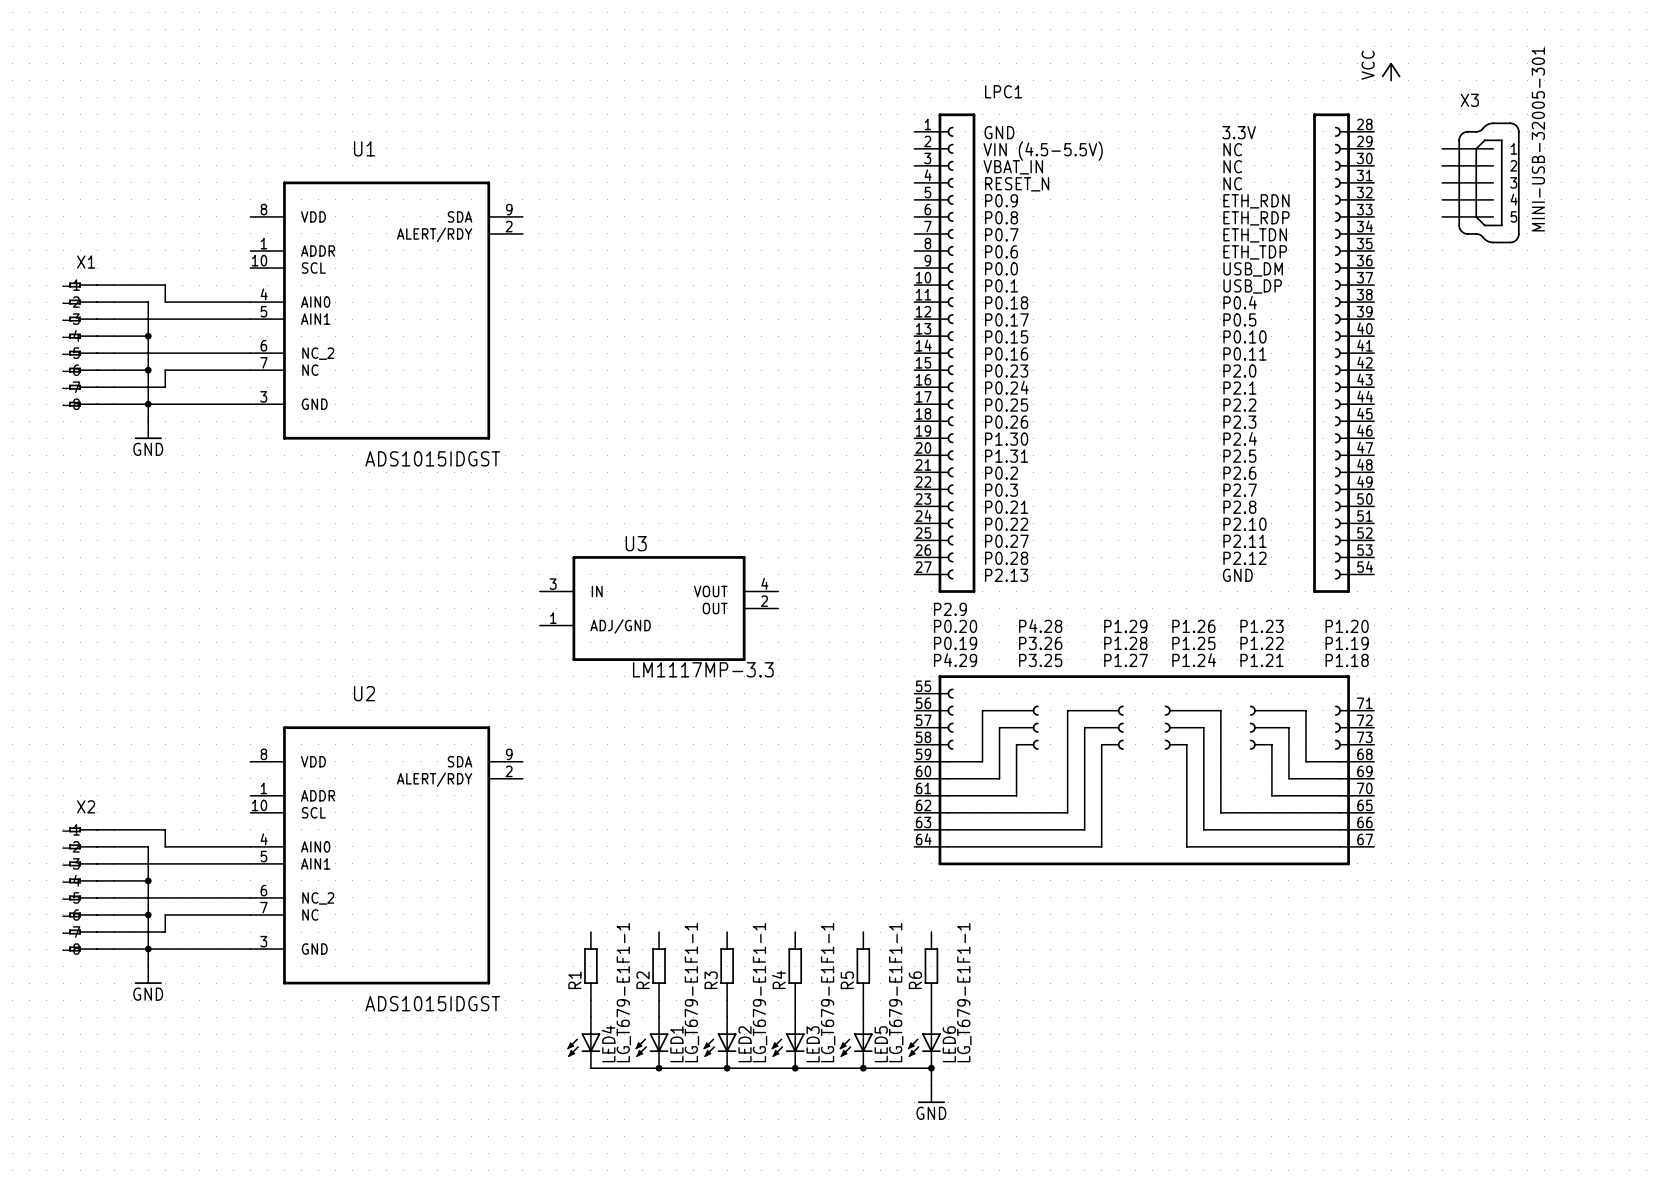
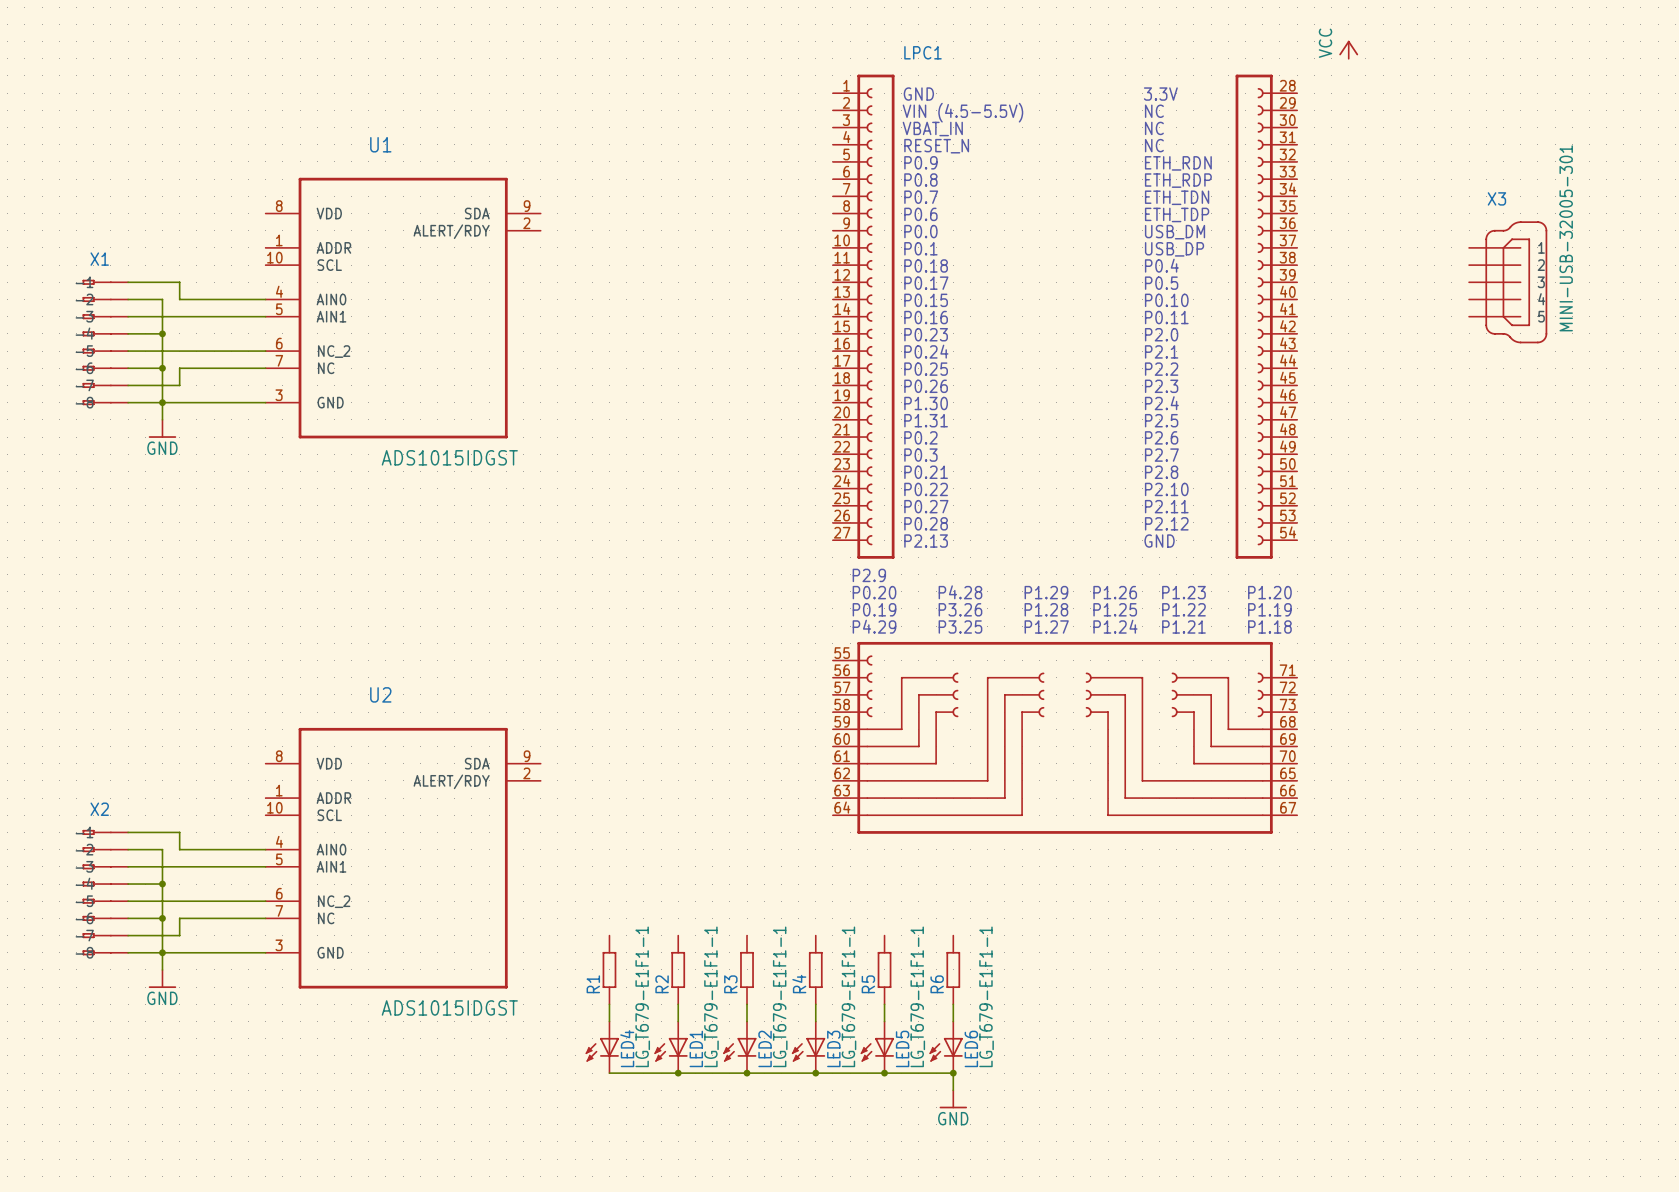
power symbol position: VCC (1391, 71) -> VCC (1348, 49)
X3 position: (1480, 182) -> (1508, 282)
LPC1 position: (1144, 489) -> (1065, 454)
U3: LM1117MP-3.3 (659, 608) -> none

